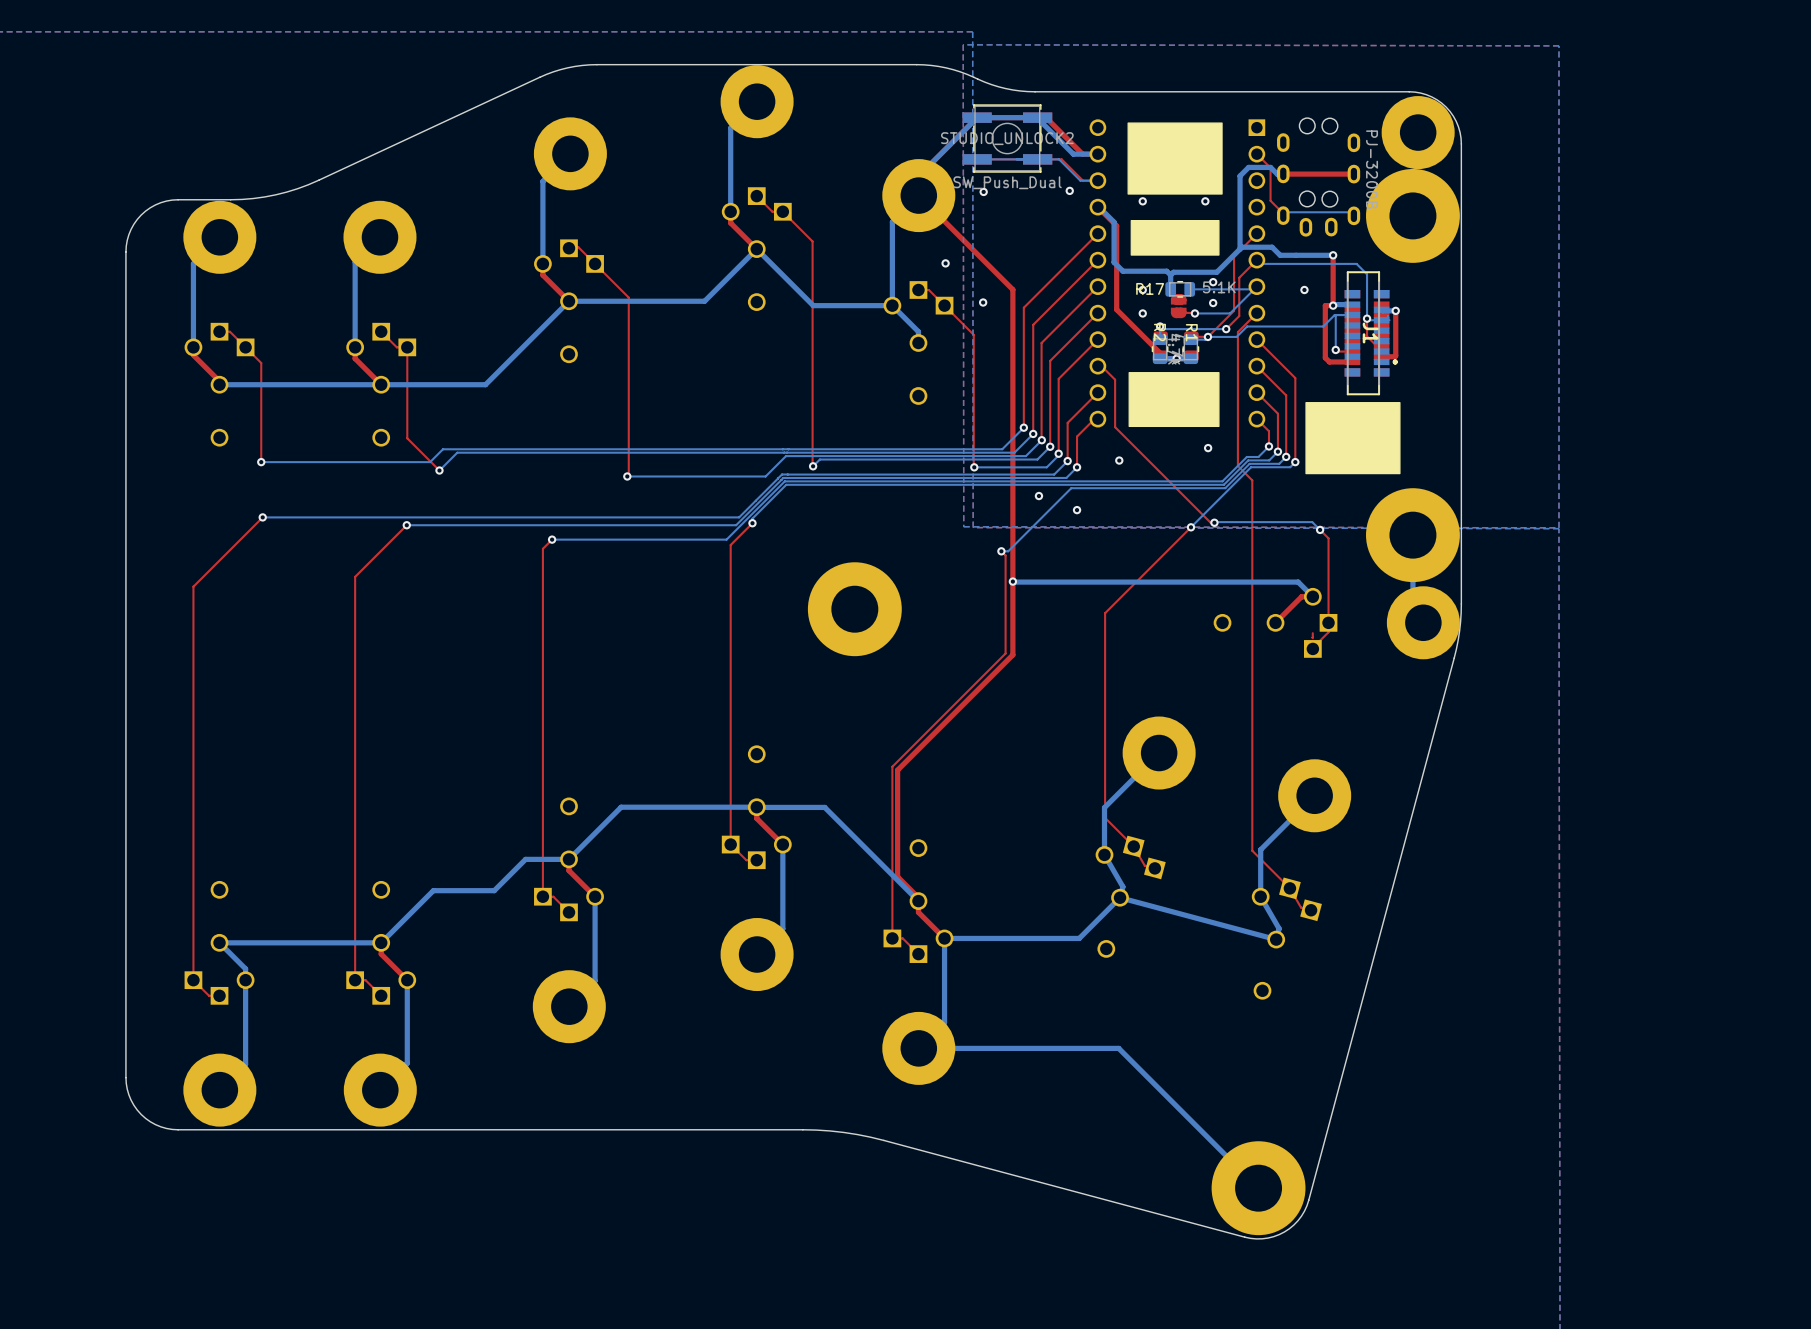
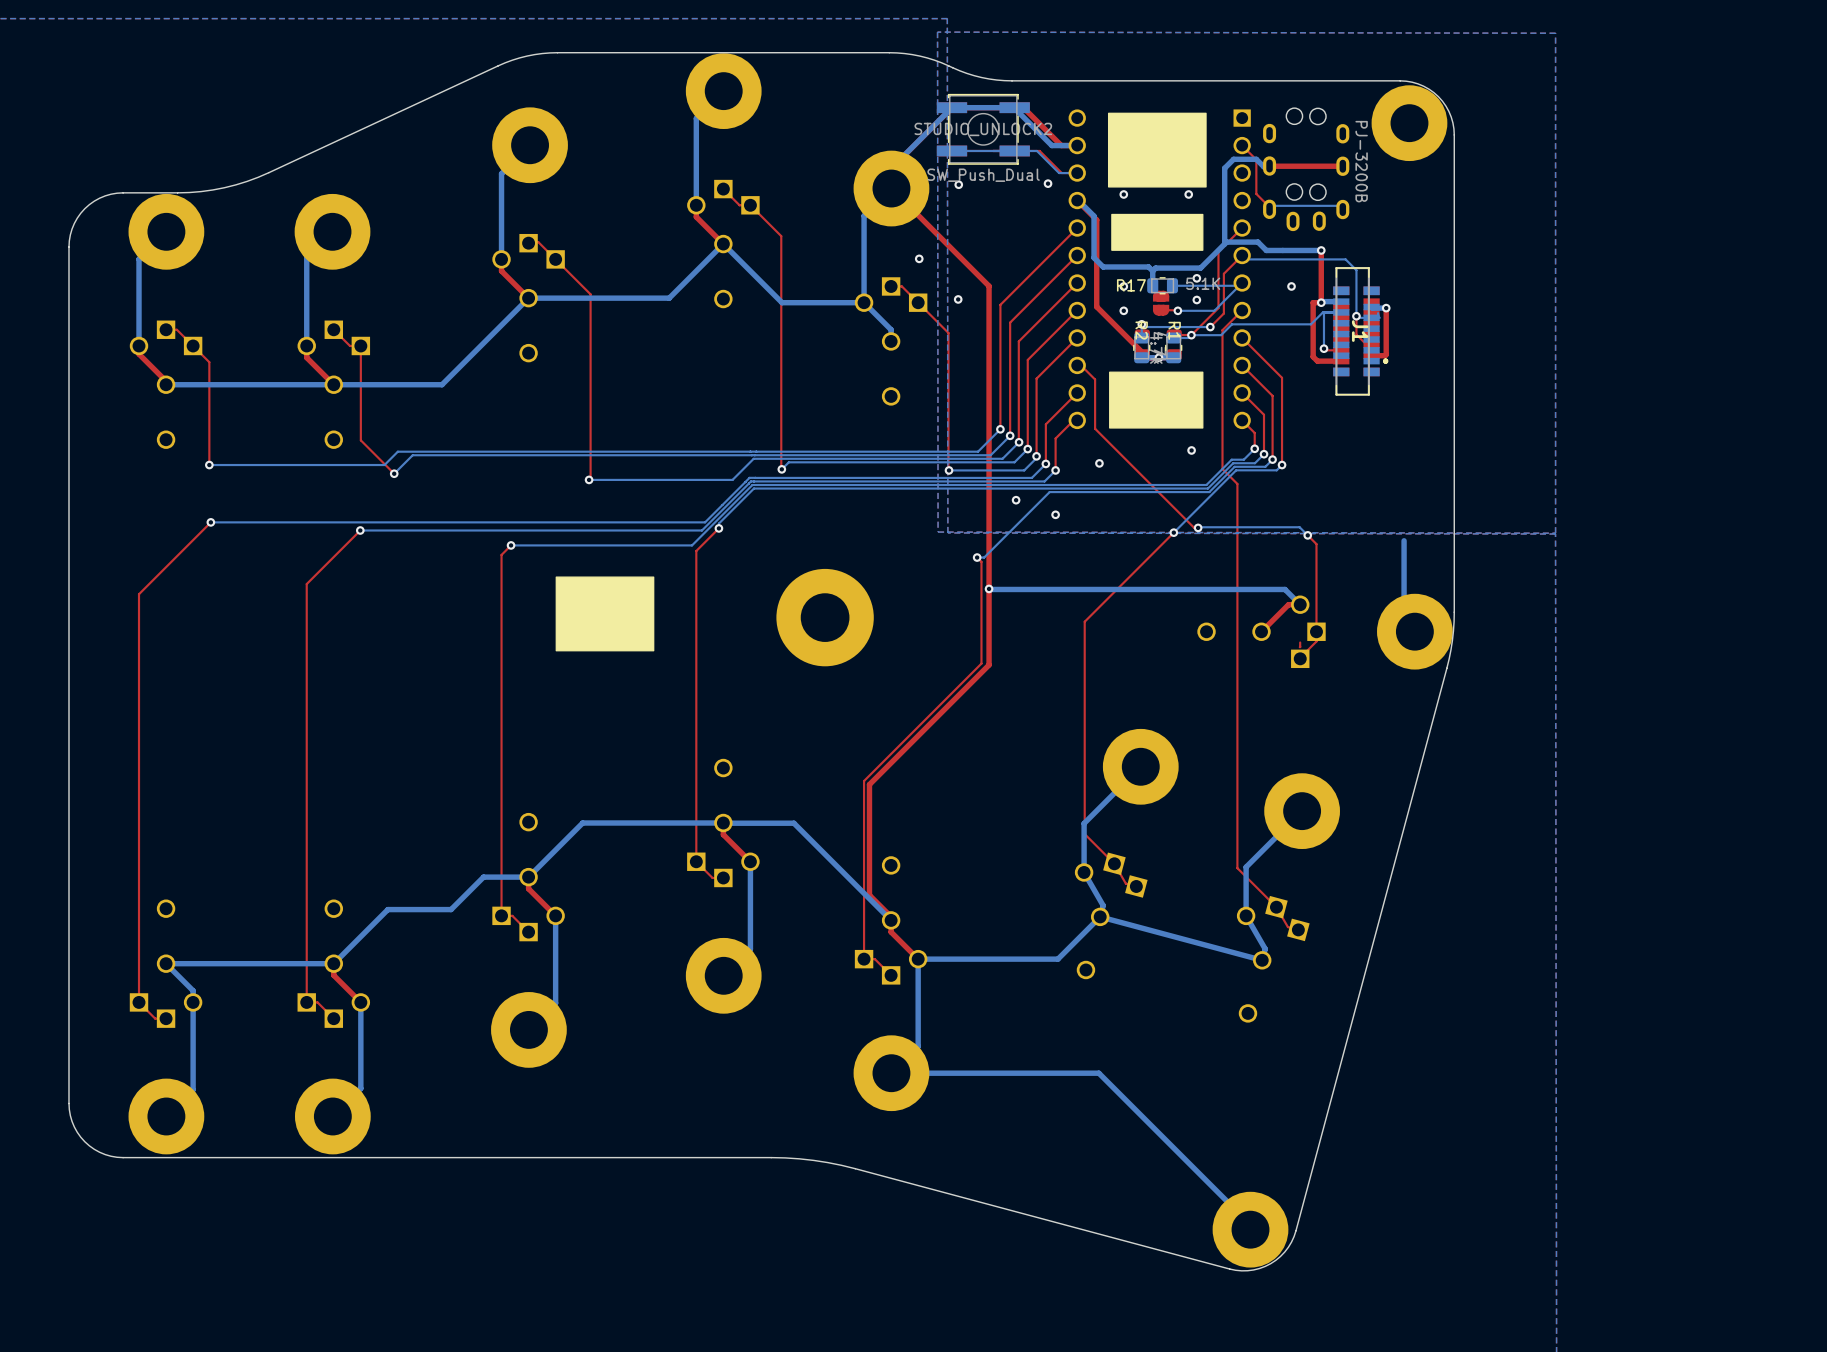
part: (1412, 215) -> none
drawing: [1305, 402, 1401, 475] -> none
part: (1412, 535) -> none
drawing: none -> [555, 576, 655, 652]
part: (1258, 1188) -> none
part: none -> (1250, 1229)

